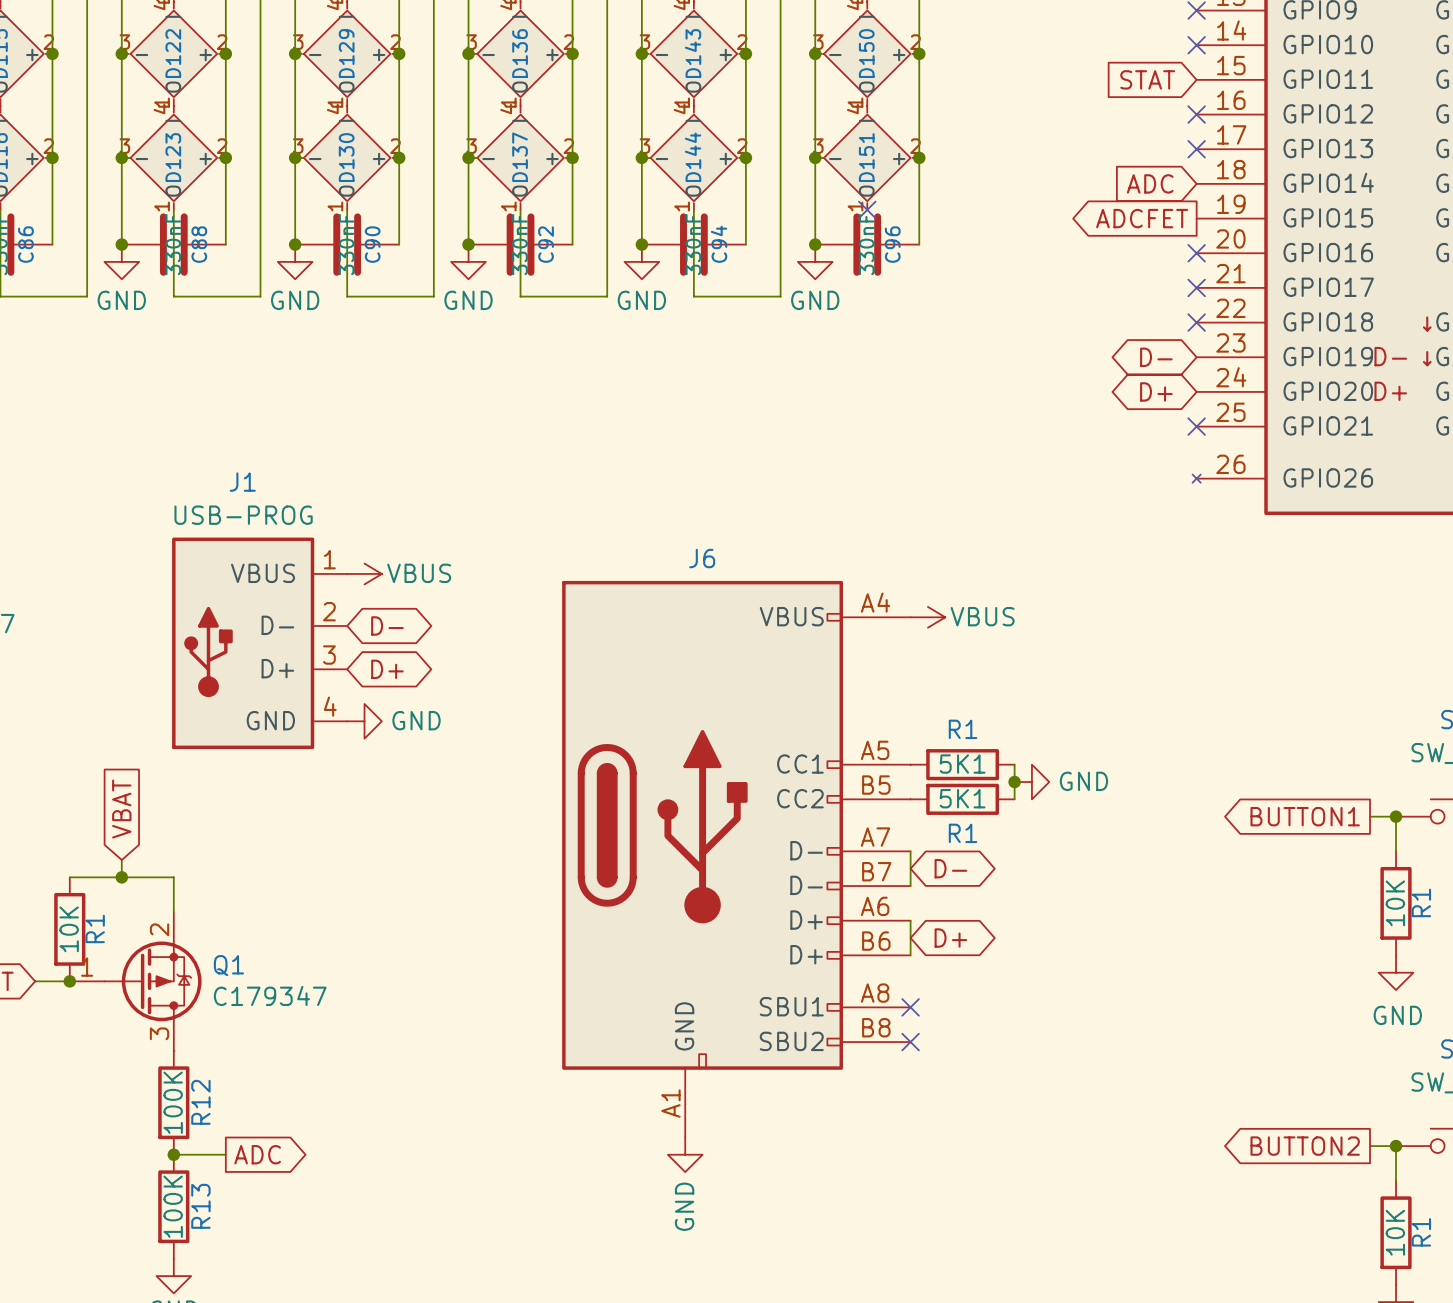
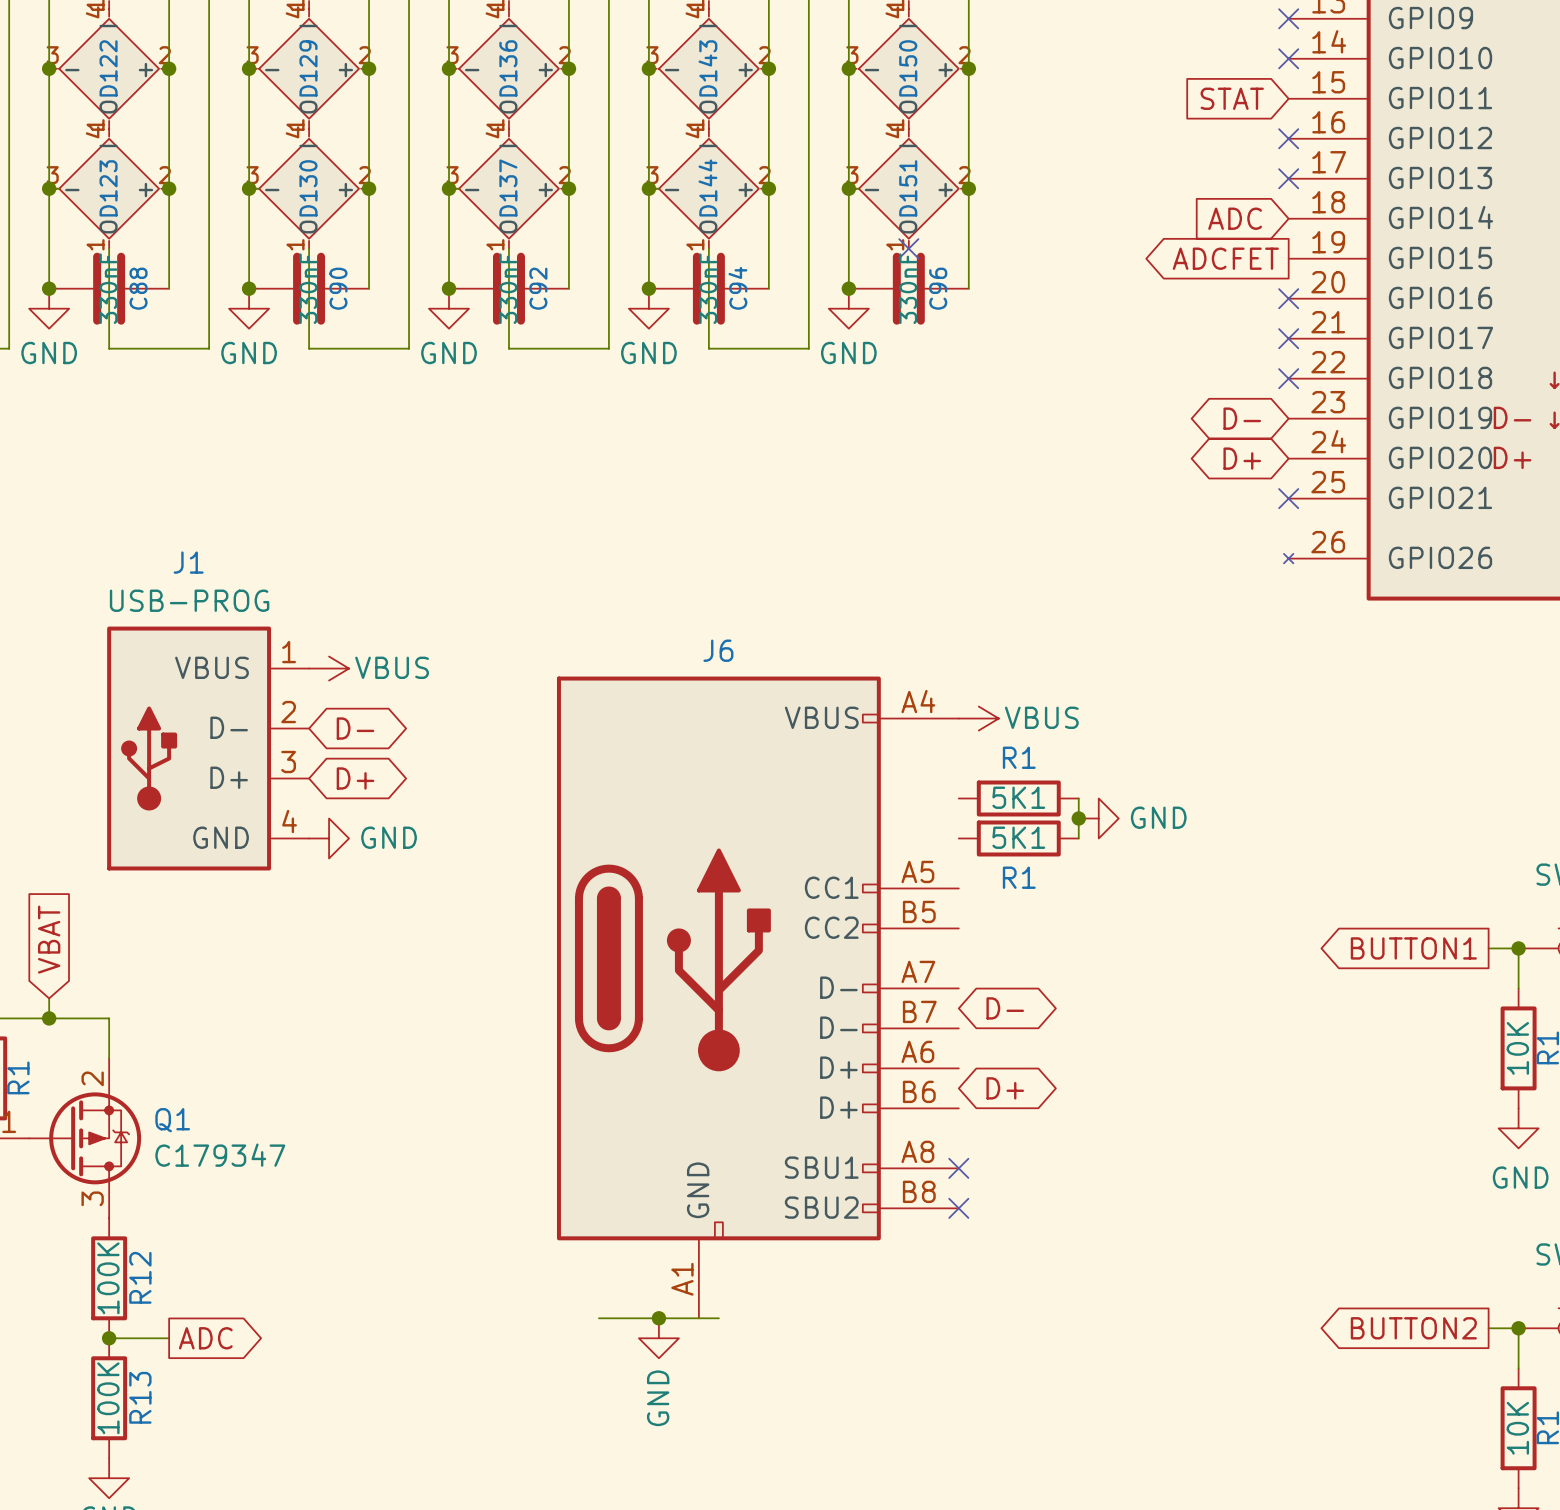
R1: none -> 5K1 (1018, 798)
R1: none -> 5K1 (1018, 838)
R1: 5K1 (962, 764) -> none
wire: (1014, 764) (1014, 799) -> (1078, 798) (1078, 838)
junction position: (1014, 782) -> (1078, 818)
power symbol position: GND (1031, 782) -> GND (1098, 818)
R1: 5K1 (962, 799) -> none
wire: (910, 851) (910, 886) -> none
wire: (910, 920) (910, 955) -> none
wire: none -> (598, 1318) (718, 1318)
junction: none -> (658, 1318)
power symbol position: GND (685, 1154) -> GND (658, 1338)

